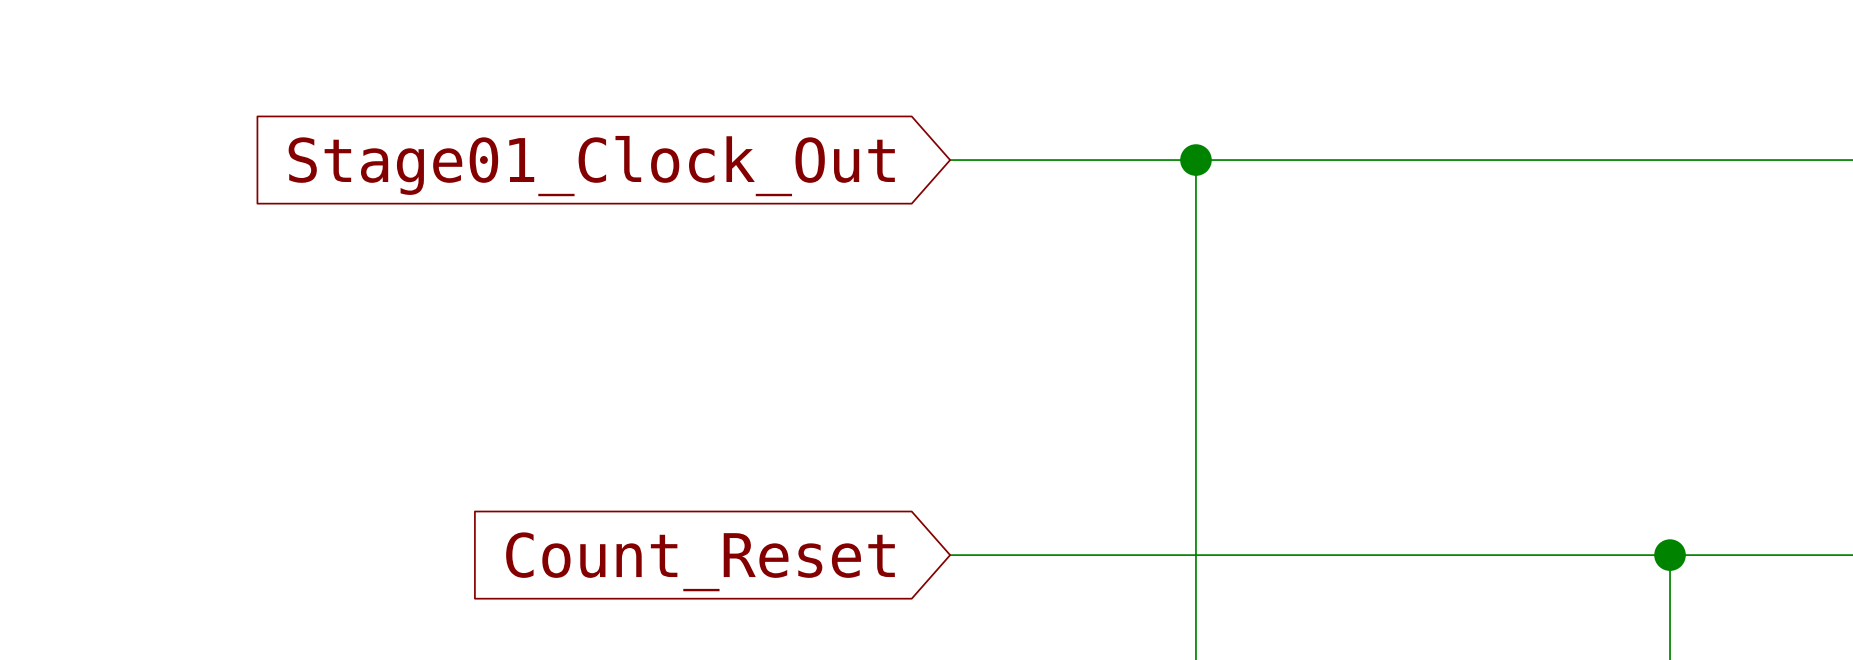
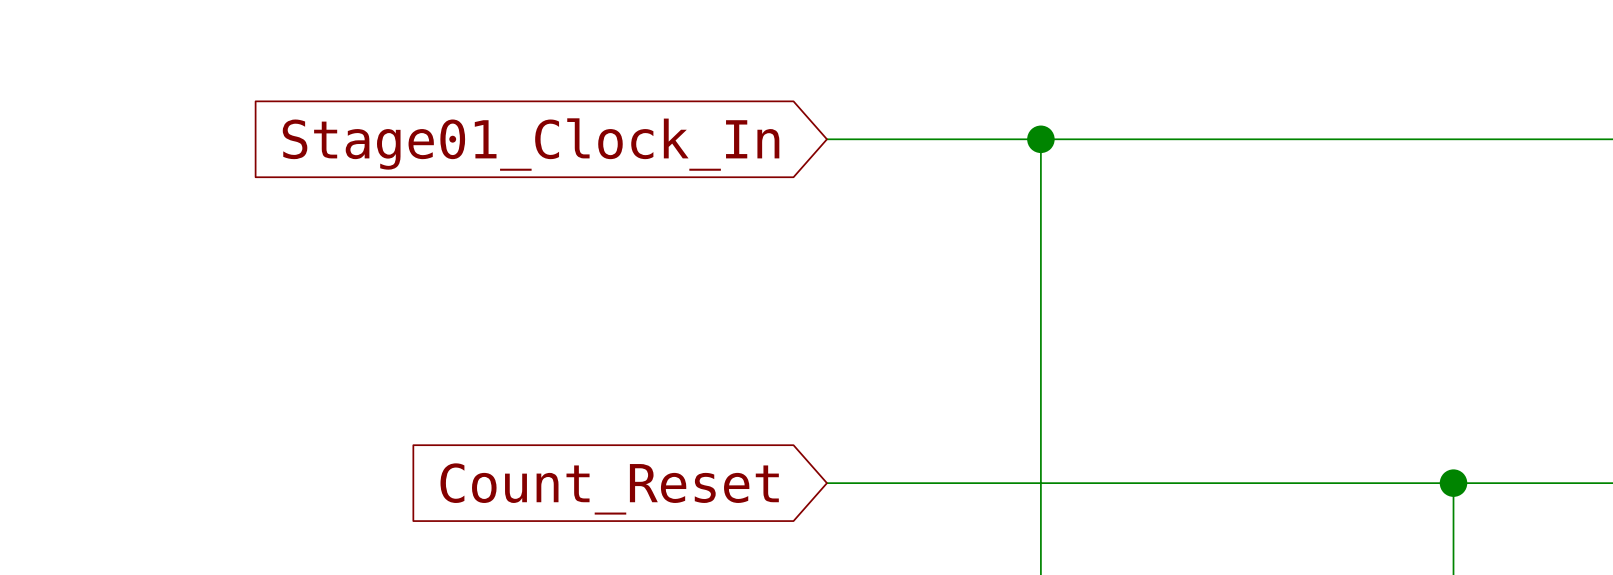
global label: Stage01_Clock_Out (591, 166) -> Stage01_Clock_In (531, 144)

